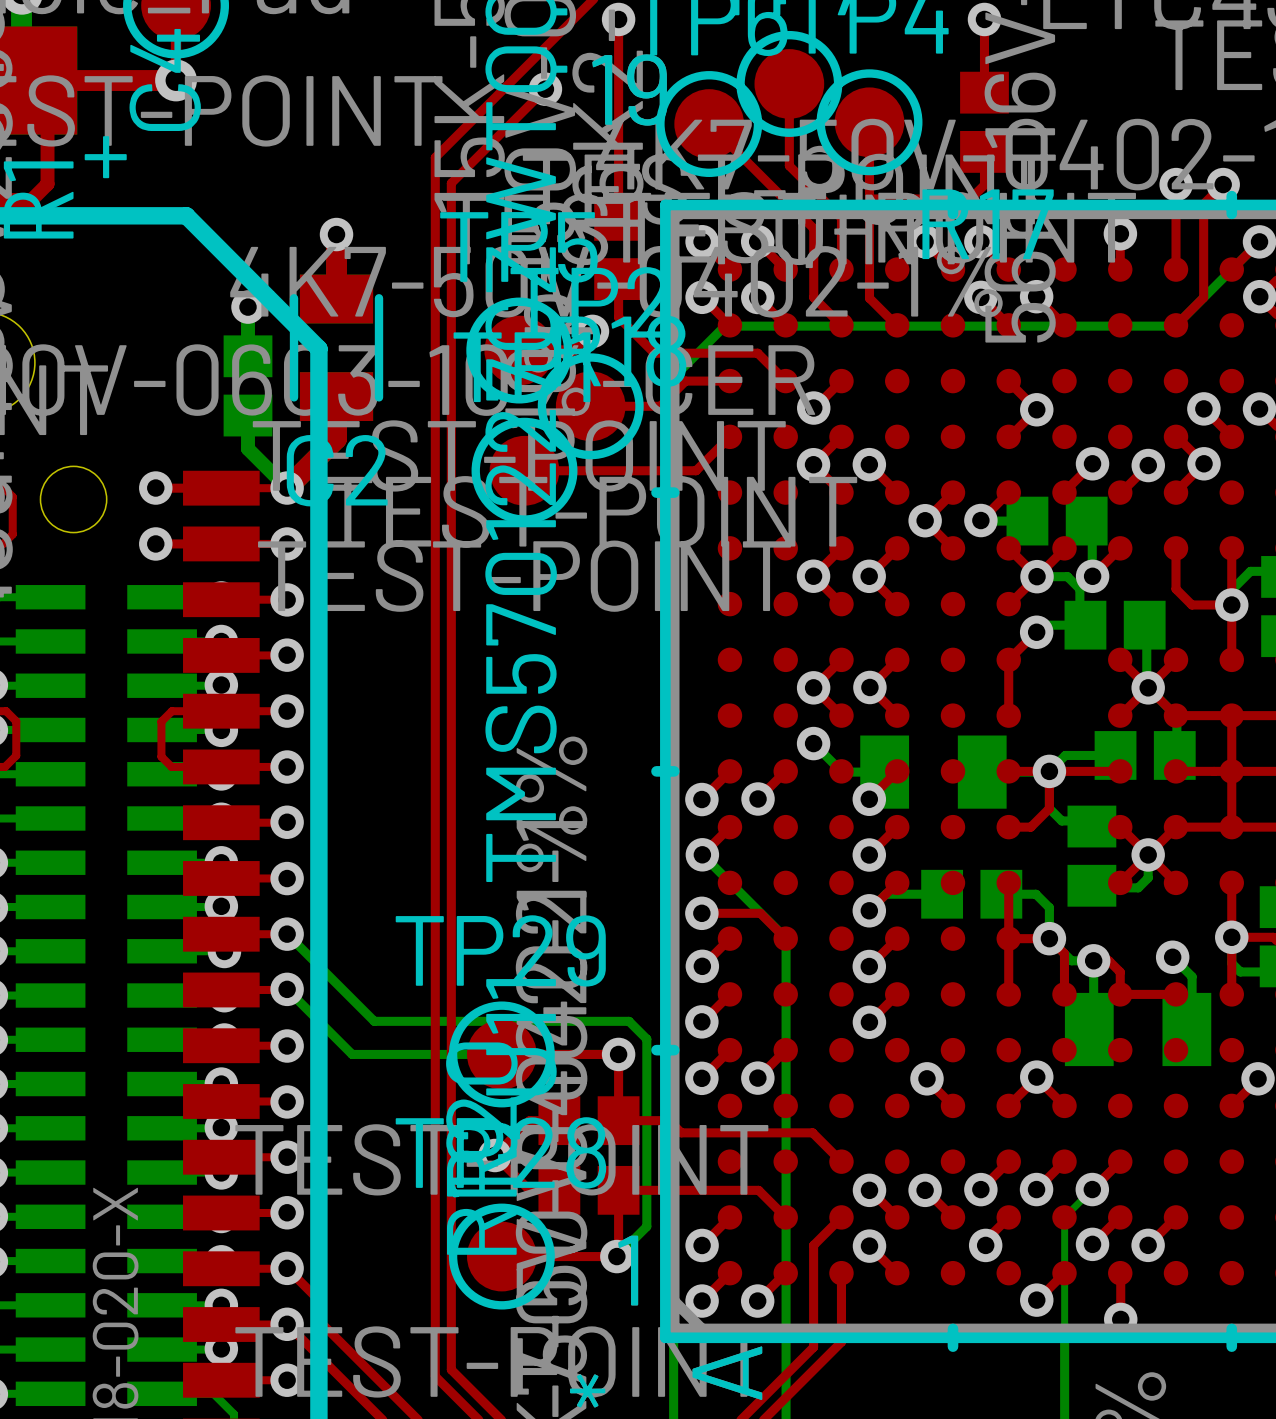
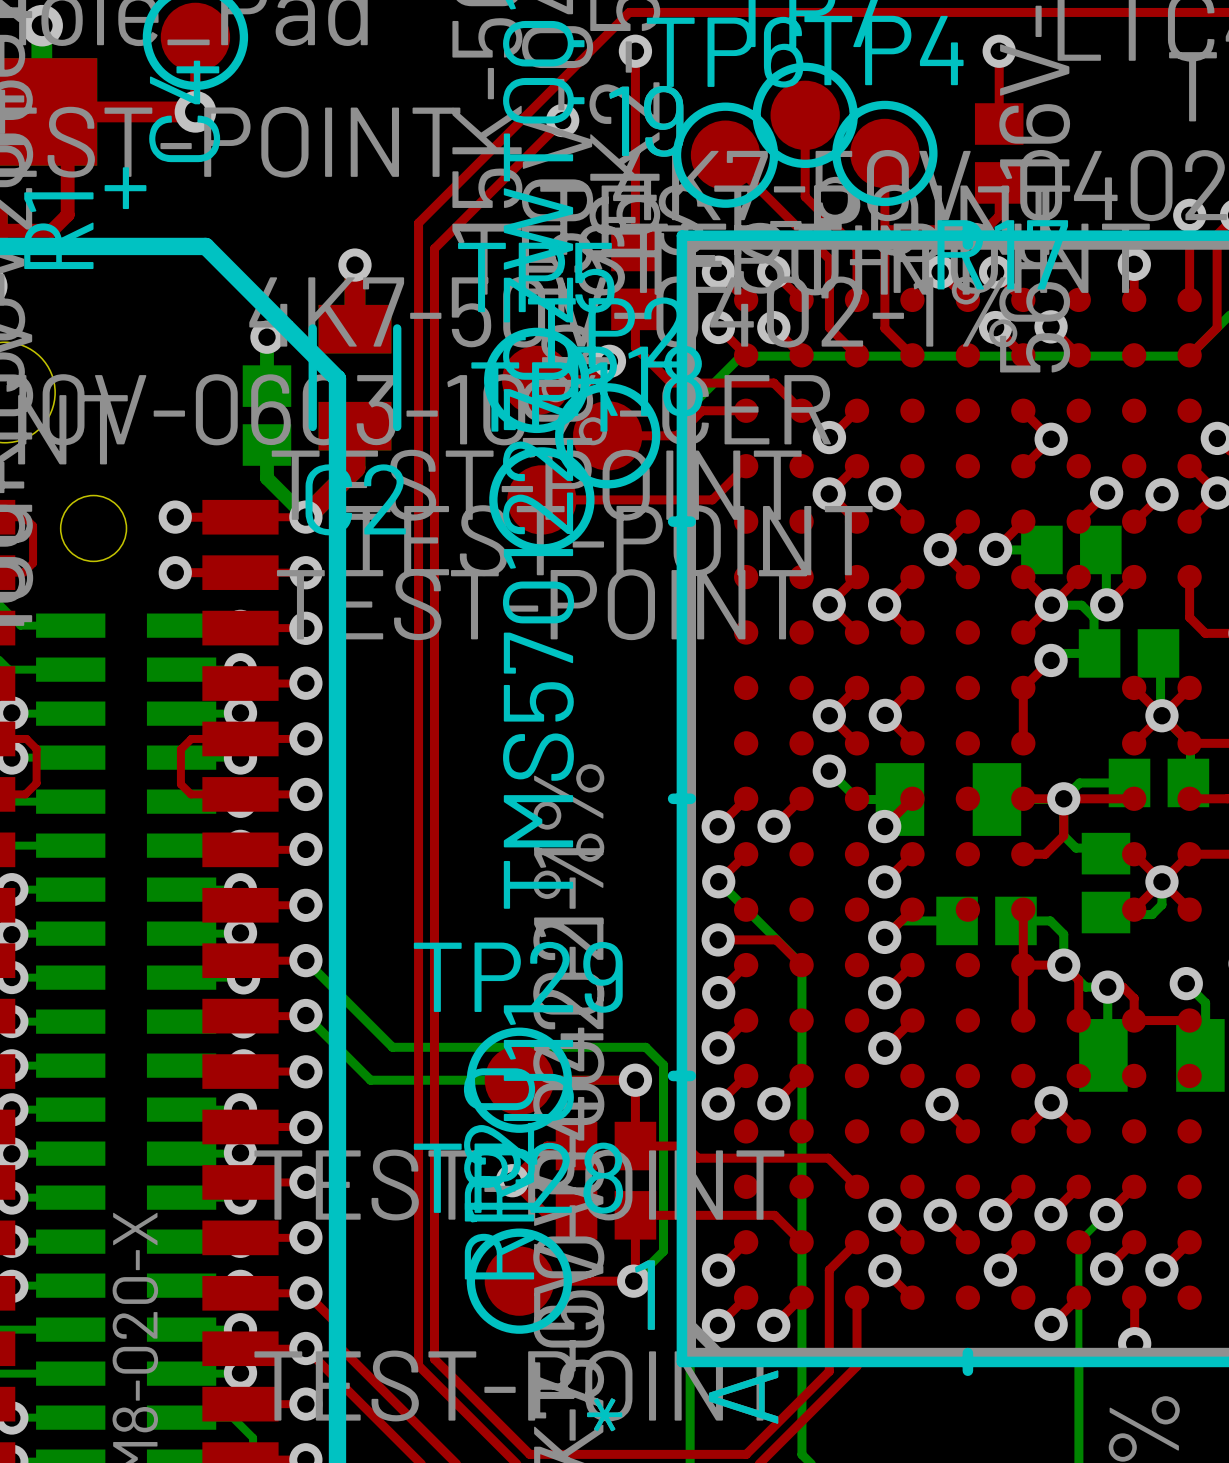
top track: (435, 157) (435, 1376) -> (453, 188) (418, 223) (418, 1365) (453, 1400)
top track: (451, 183) (451, 1369) -> (469, 214) (434, 248) (434, 1359) (469, 1393)

